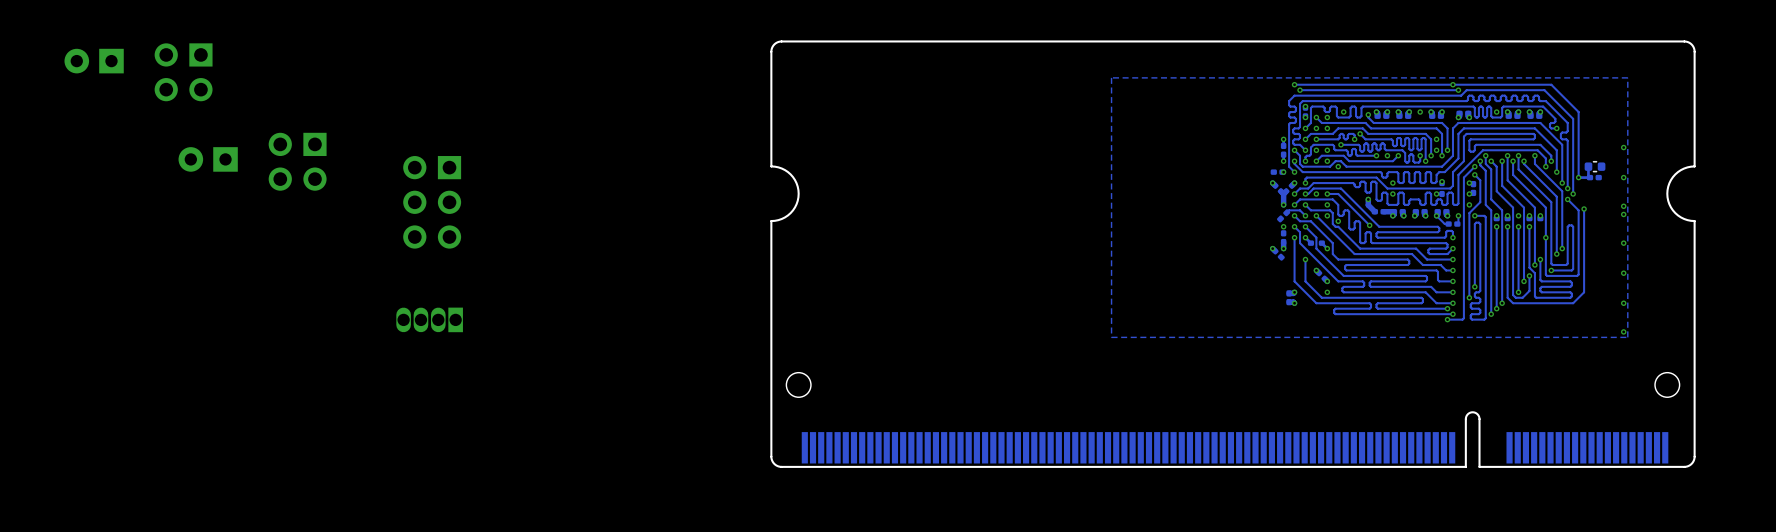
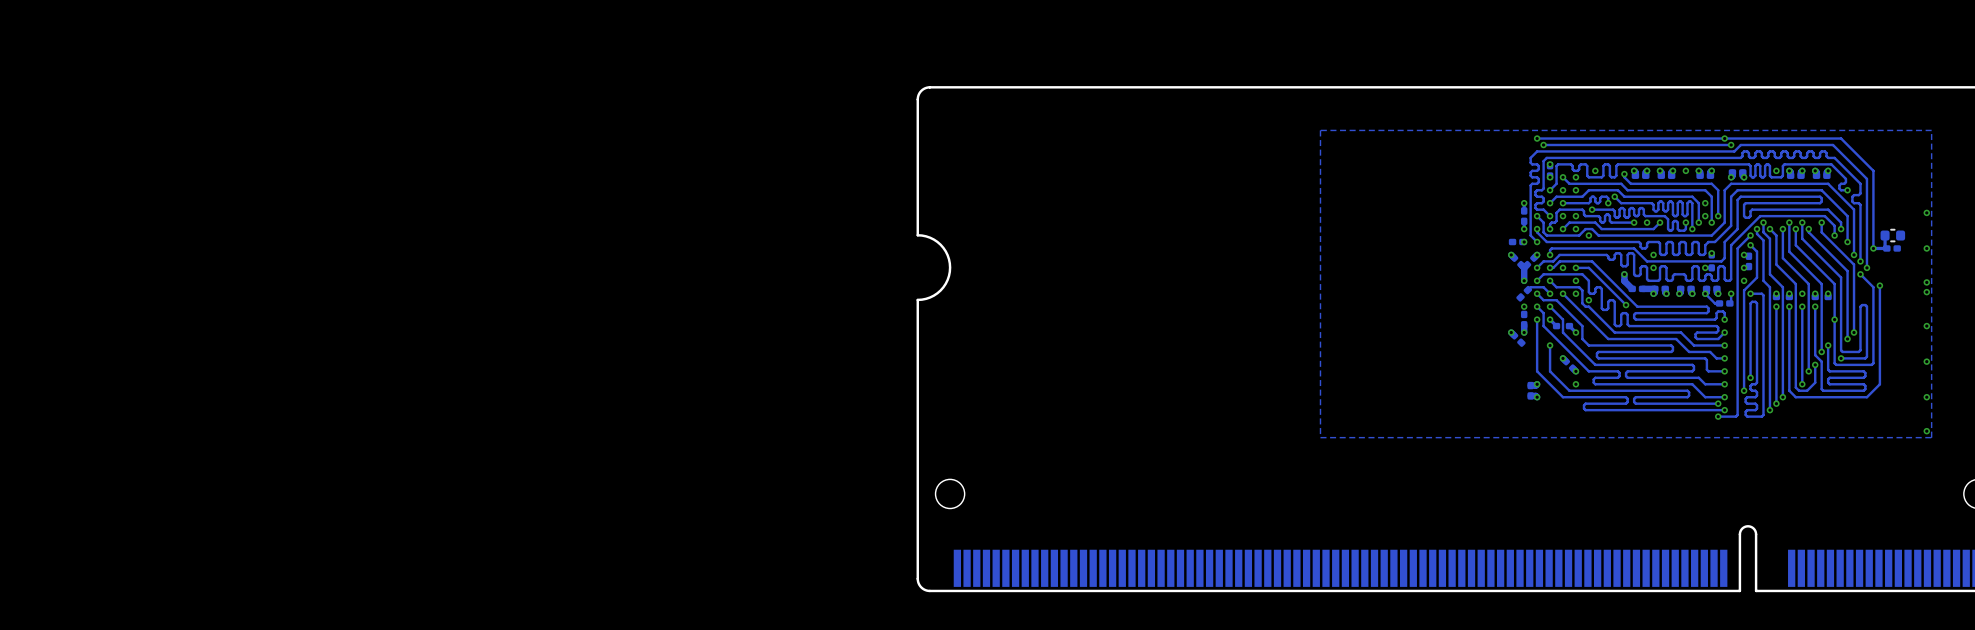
part: (94, 61) -> none
part: (183, 72) -> none
part: (208, 159) -> none
part: (297, 161) -> none
part: (432, 202) -> none
part: (429, 319) -> none

